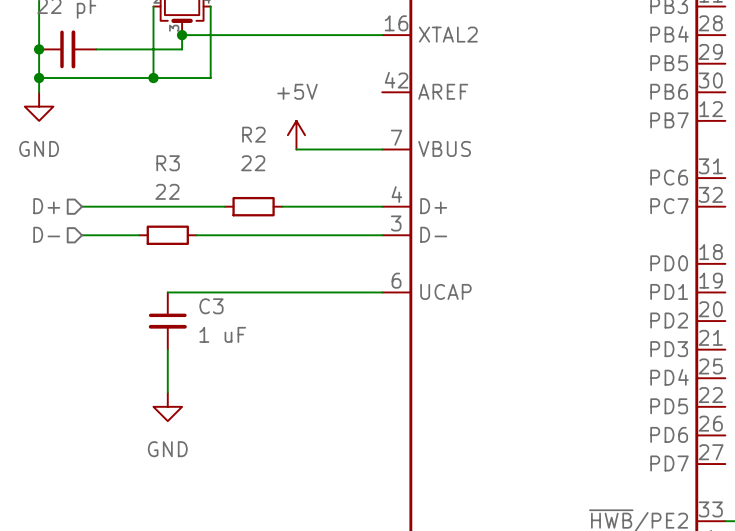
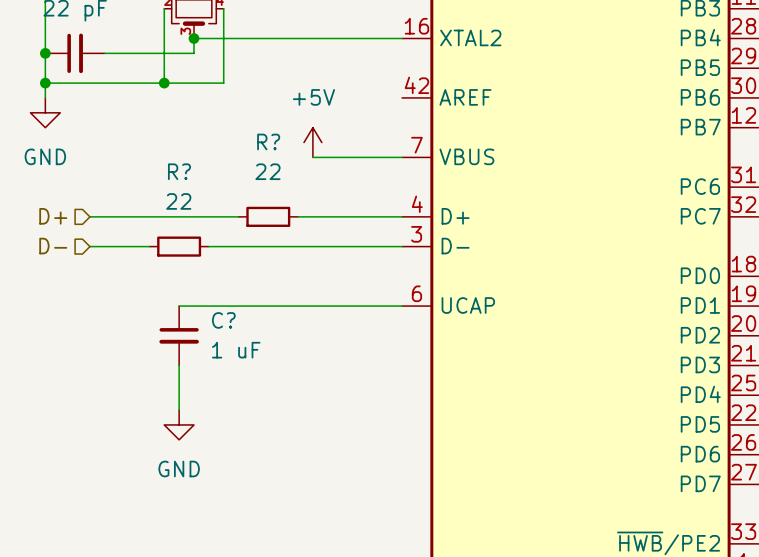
R2 name: R2 (253, 134) -> R? (268, 141)
R3 name: R3 (168, 163) -> R? (179, 171)
C3 name: C3 (211, 306) -> C? (223, 320)

